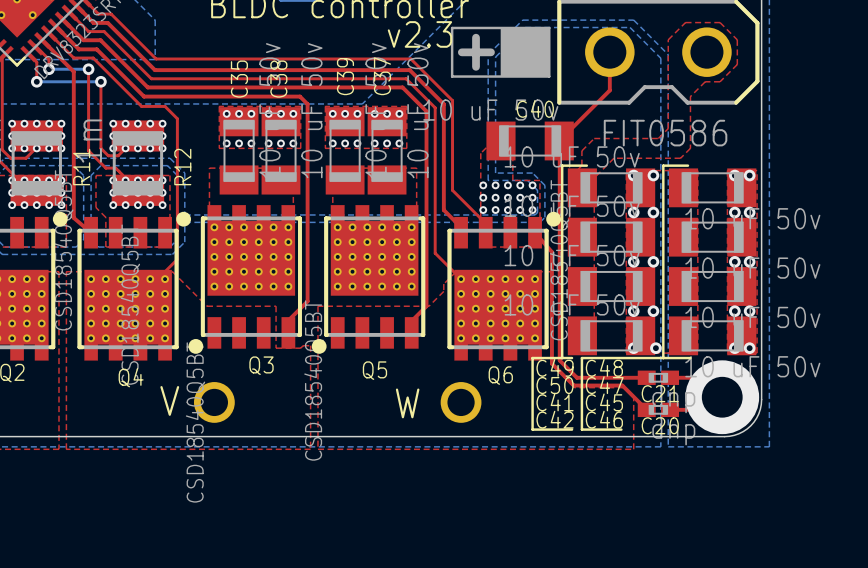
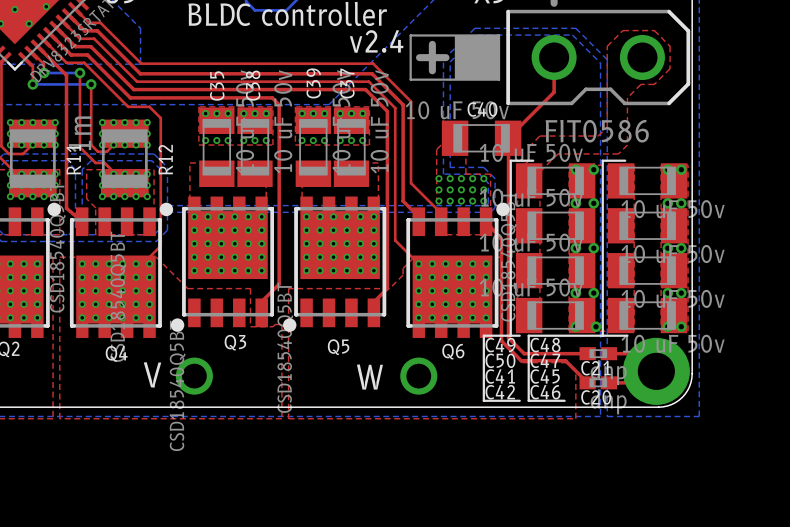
text: v2.3 (419, 34) -> v2.4 (376, 41)

